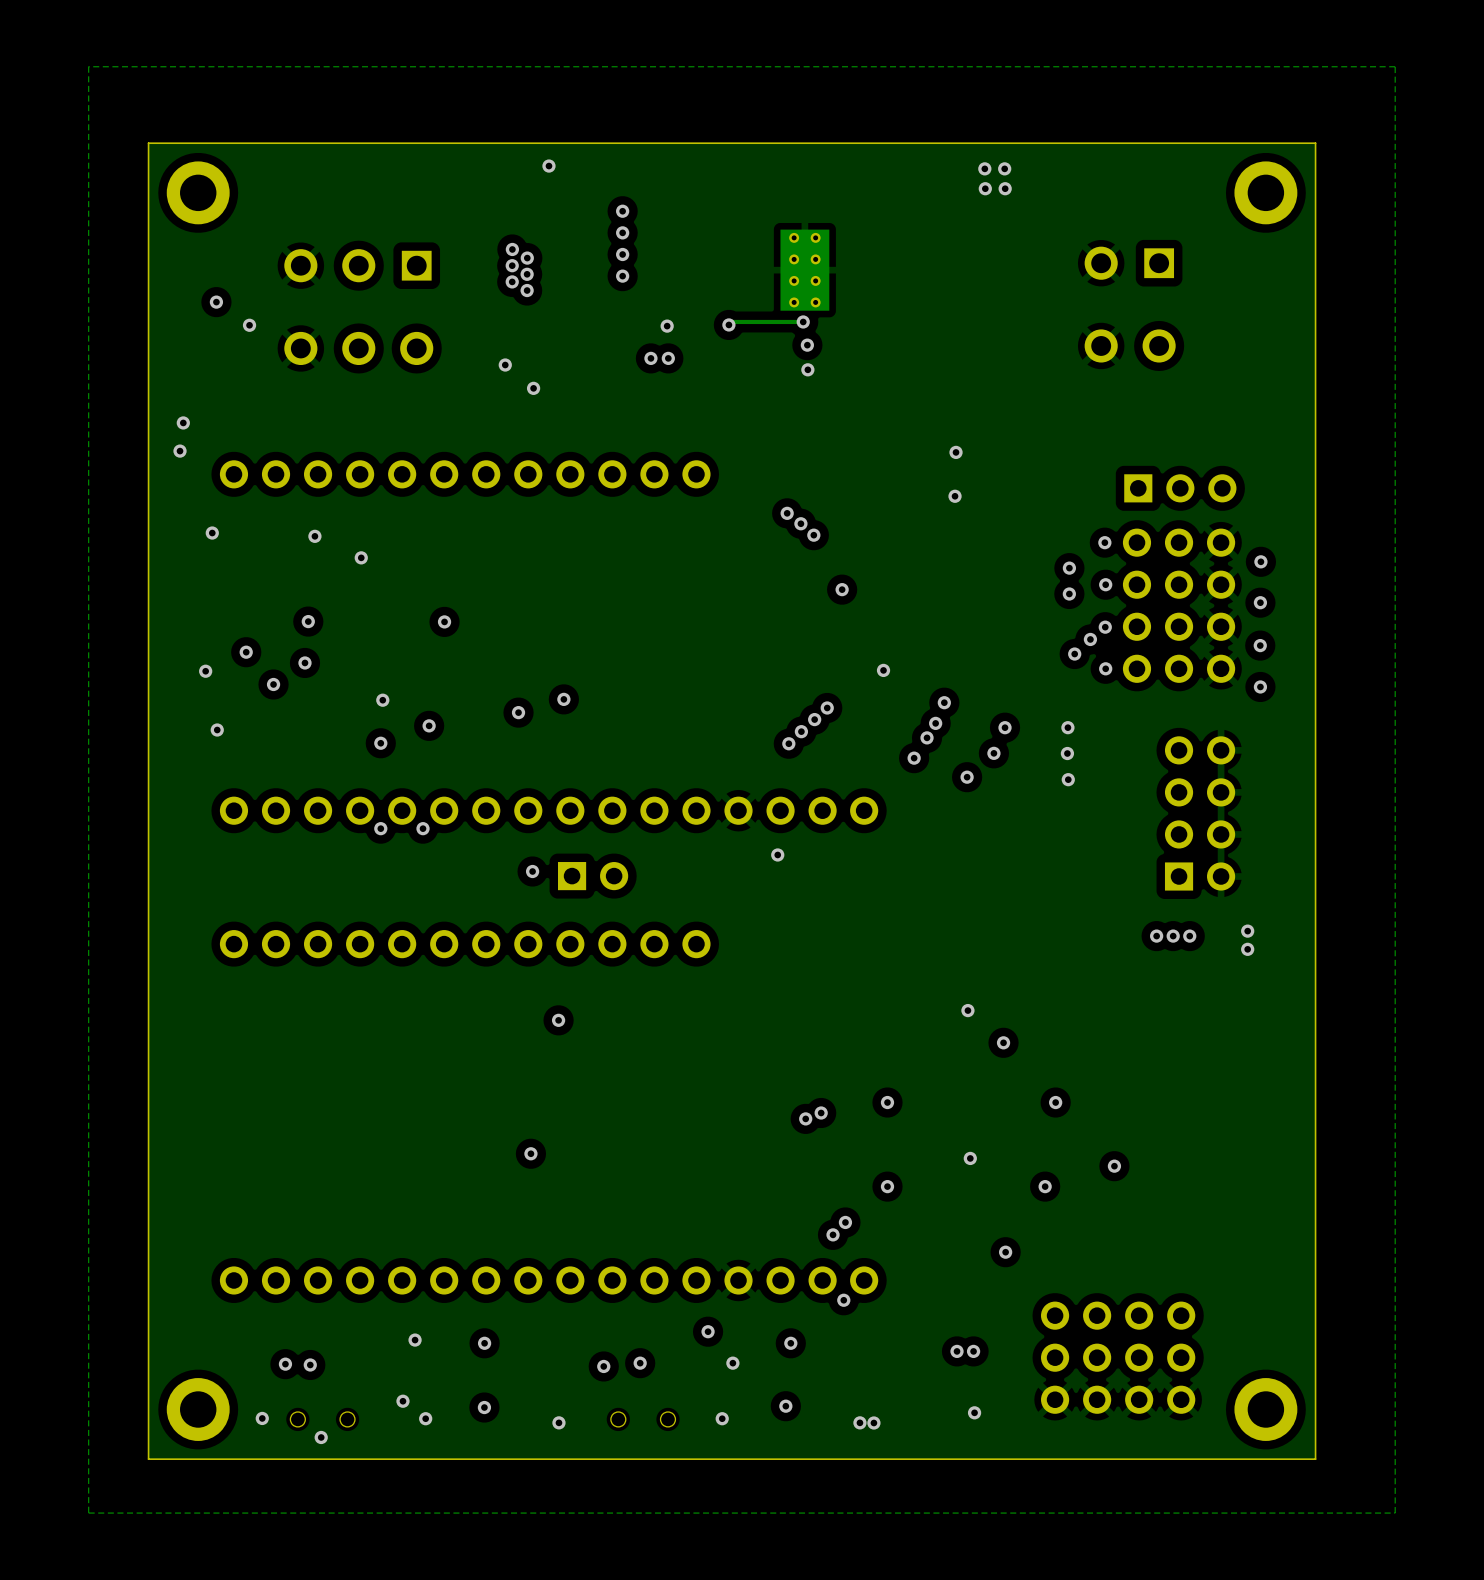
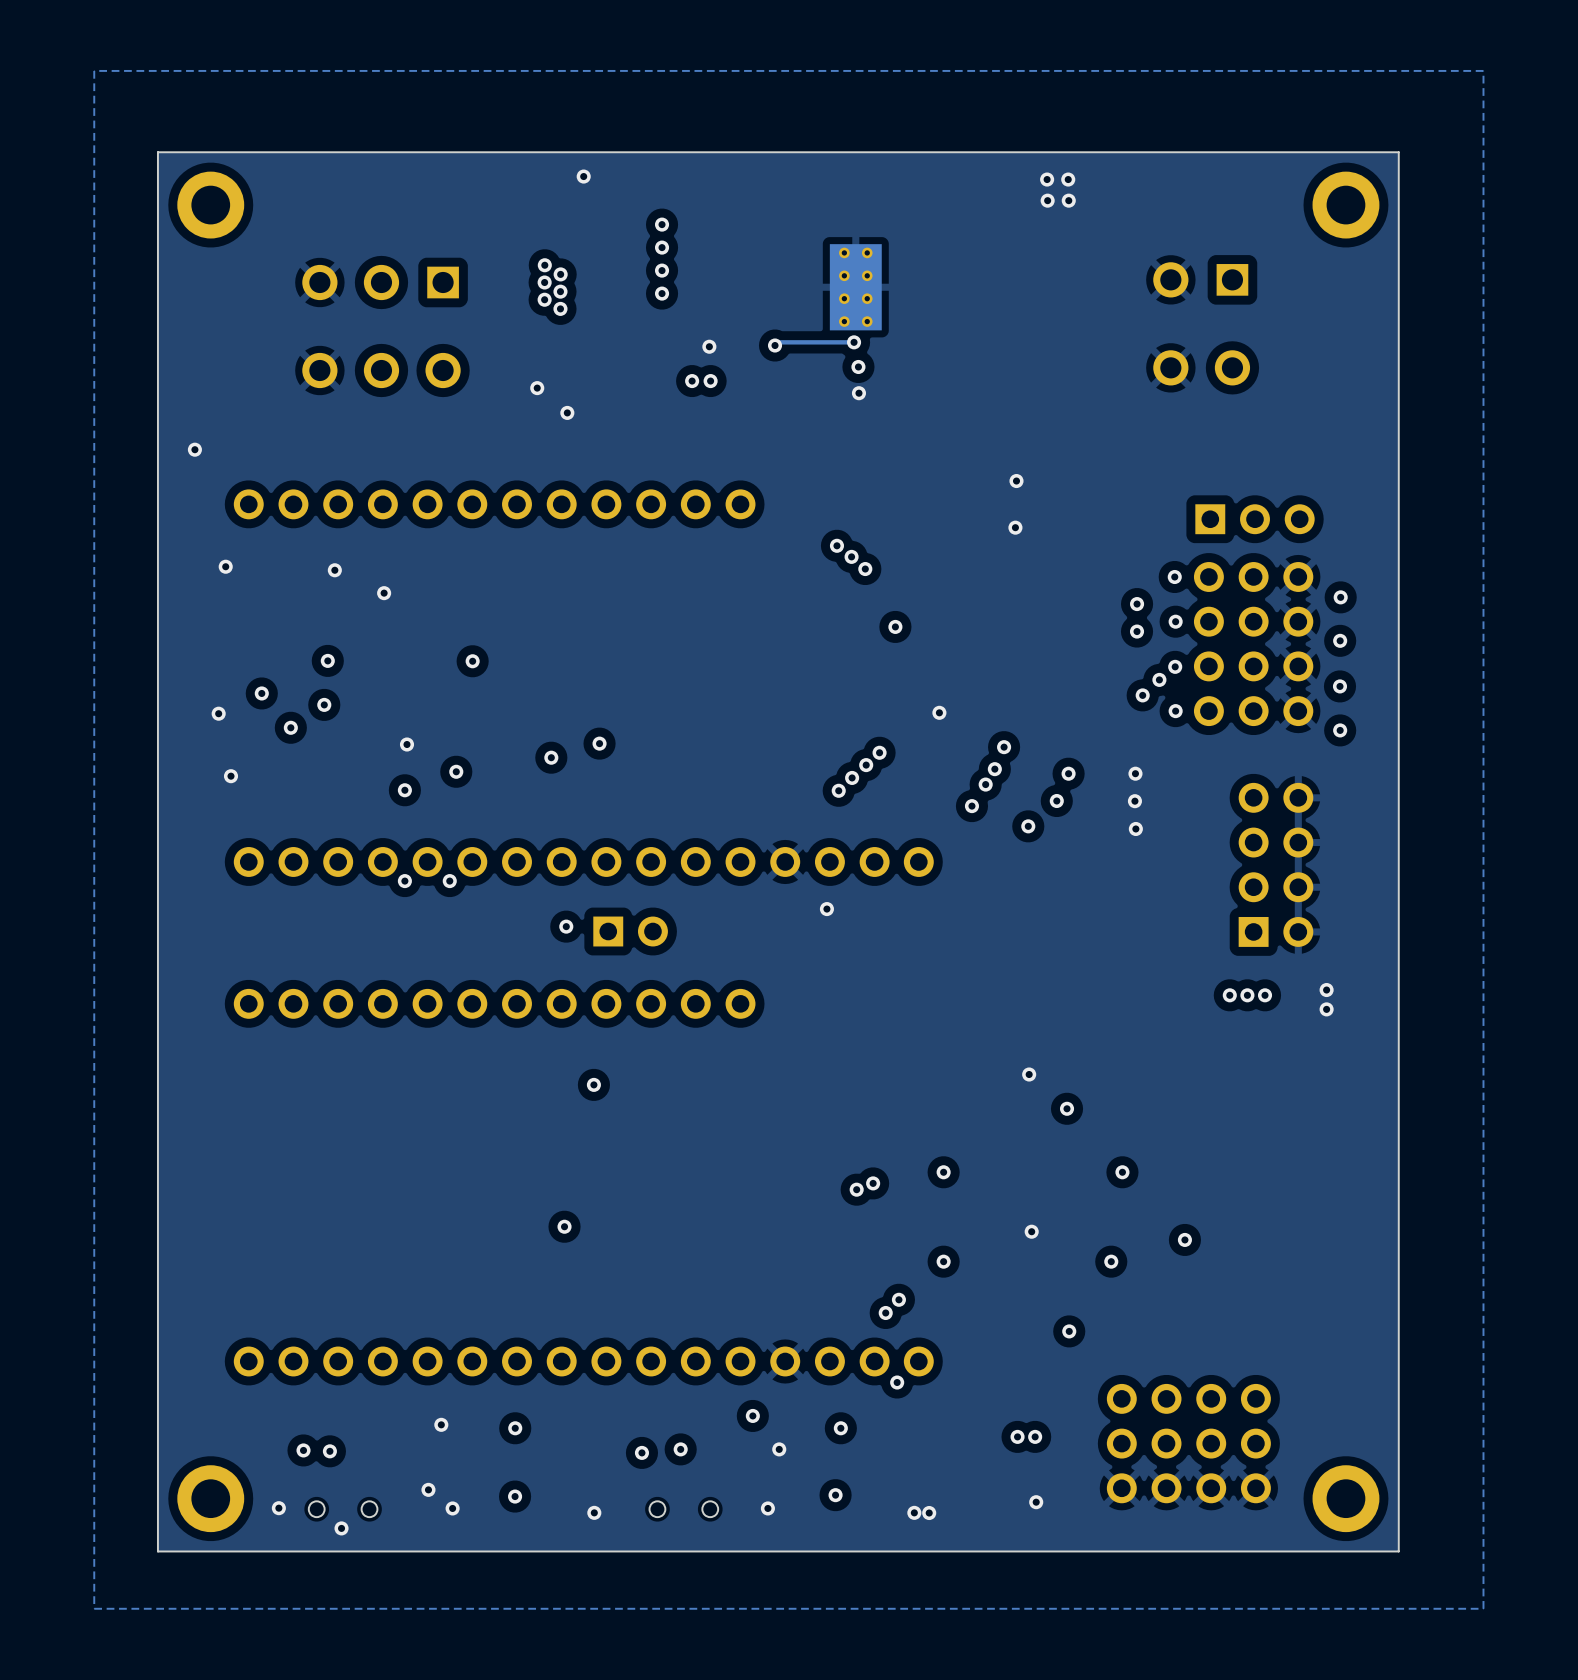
via: (216, 302) -> none
via: (249, 325) -> none
via: (180, 451) -> none

